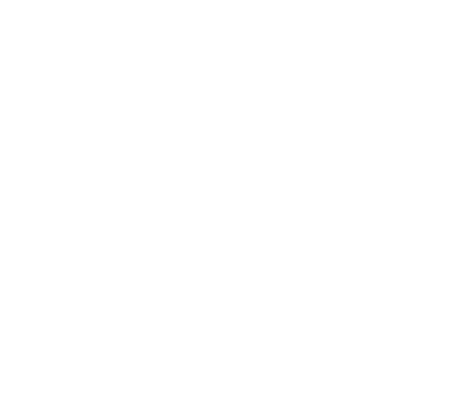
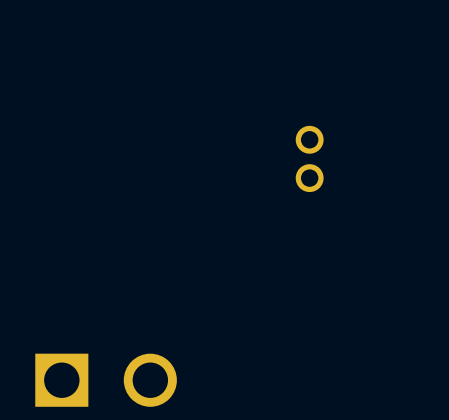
part: none -> (309, 158)
part: none -> (106, 380)

